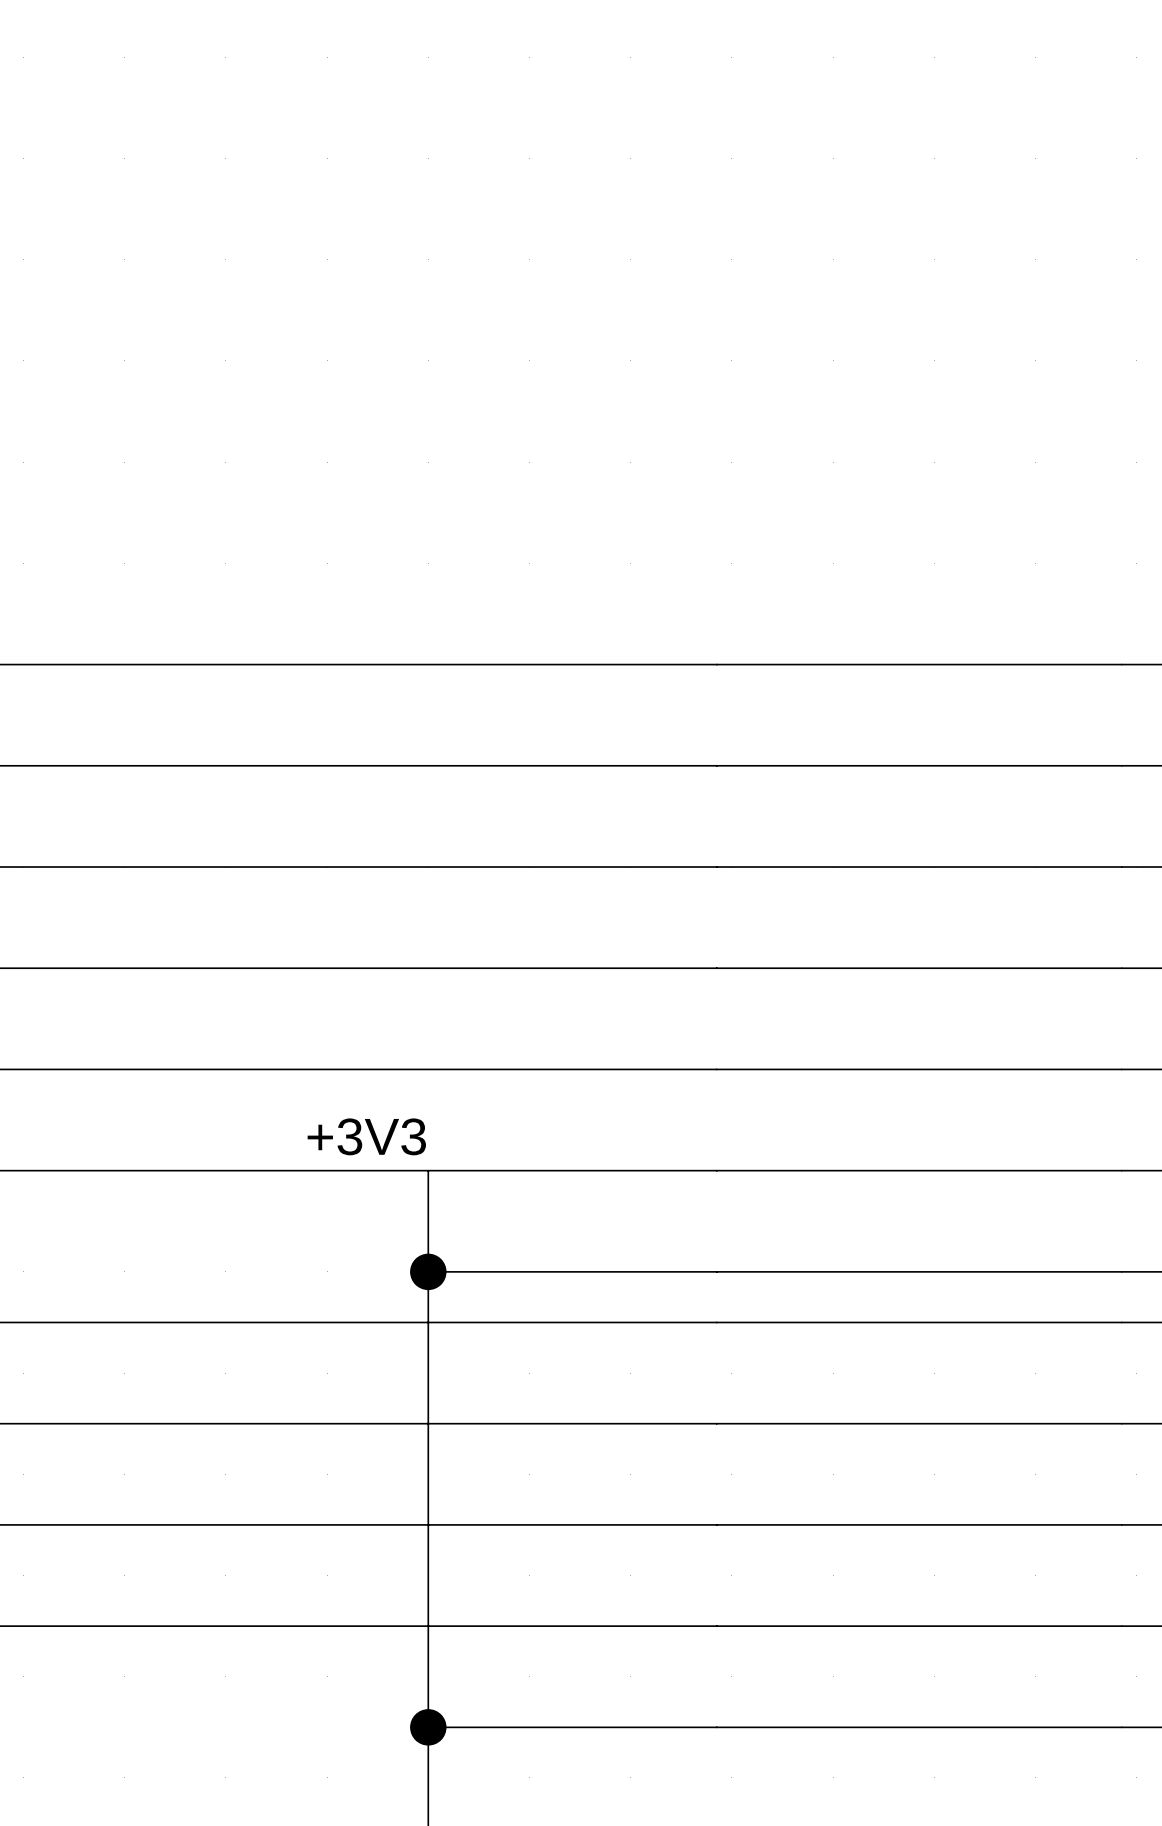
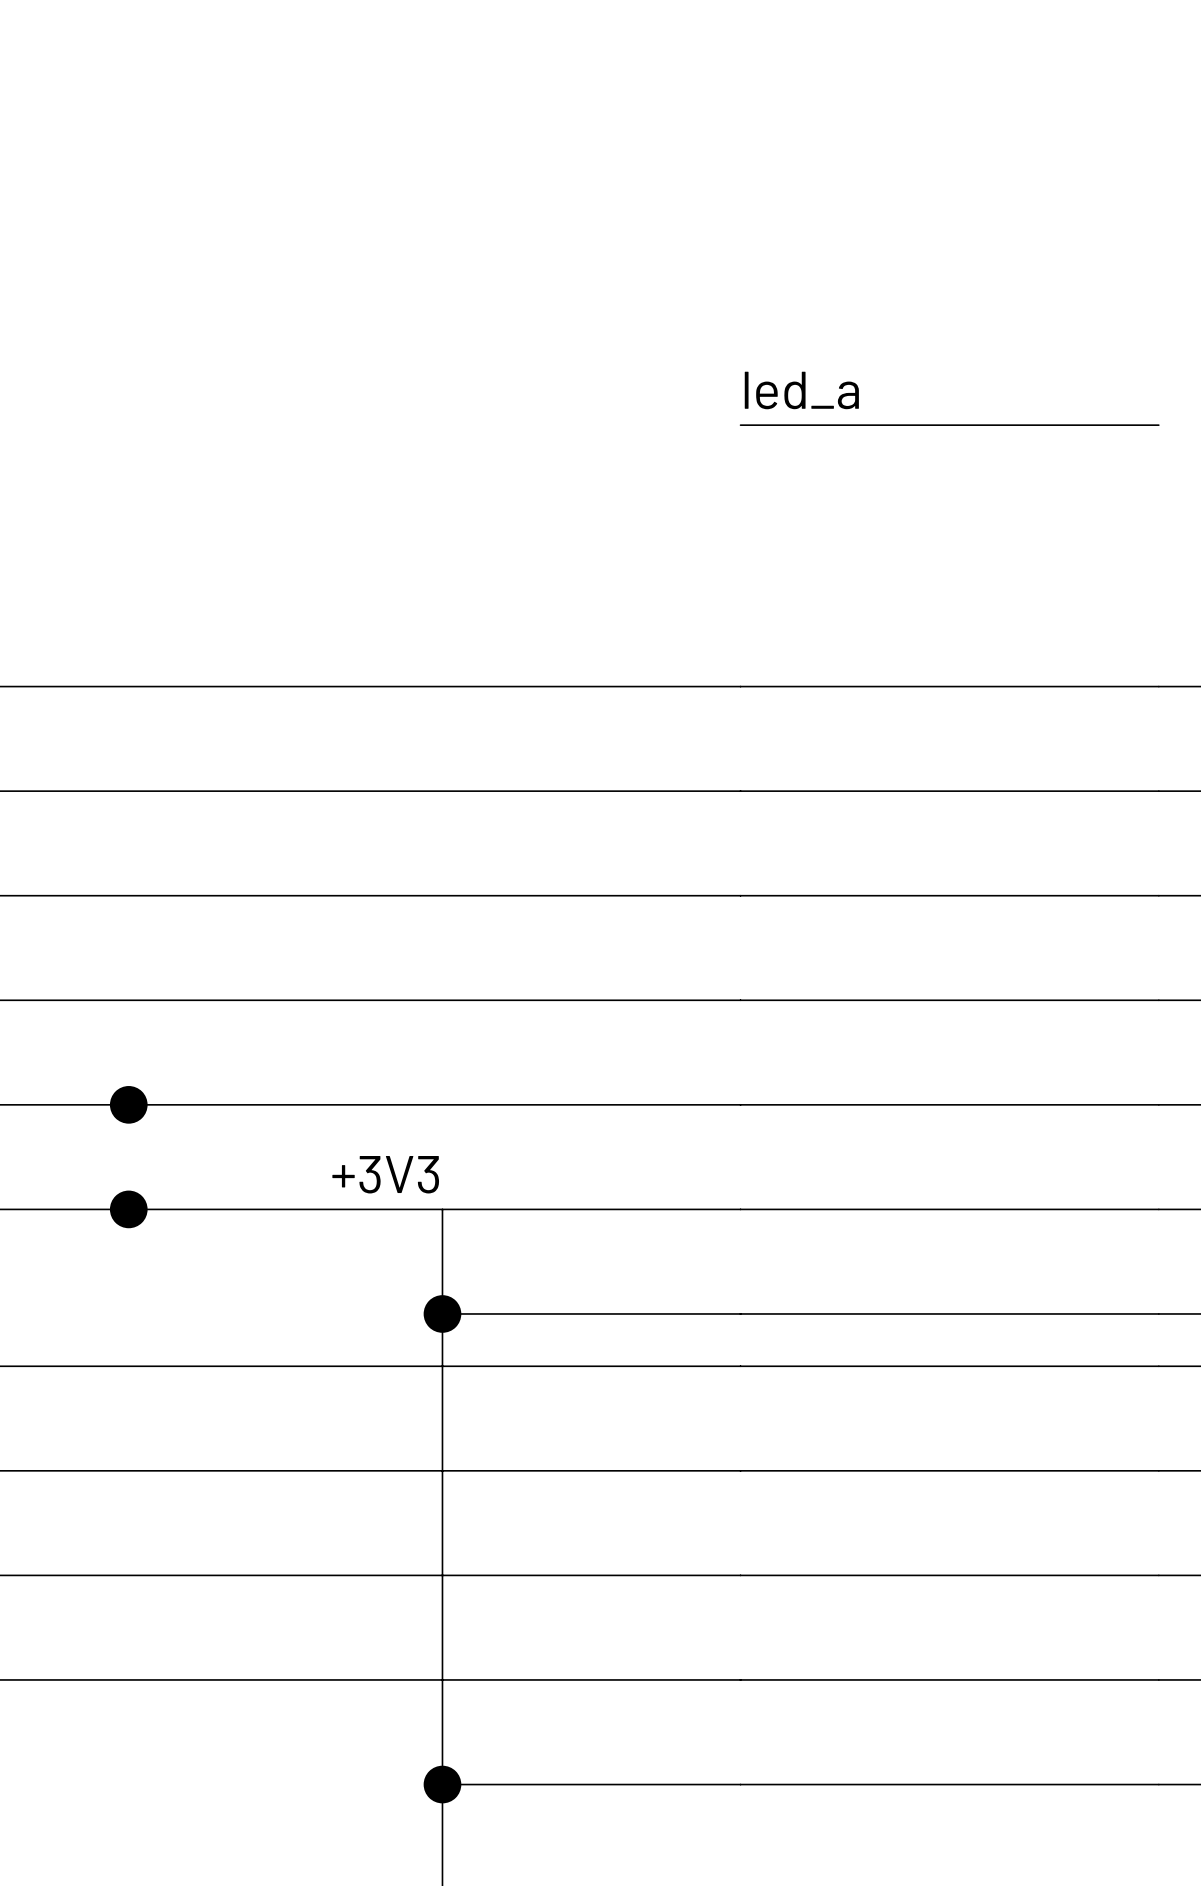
label: none -> led_a (801, 390)
wire: none -> (740, 425) (1158, 425)
junction: none -> (128, 1104)
junction: none -> (128, 1209)

